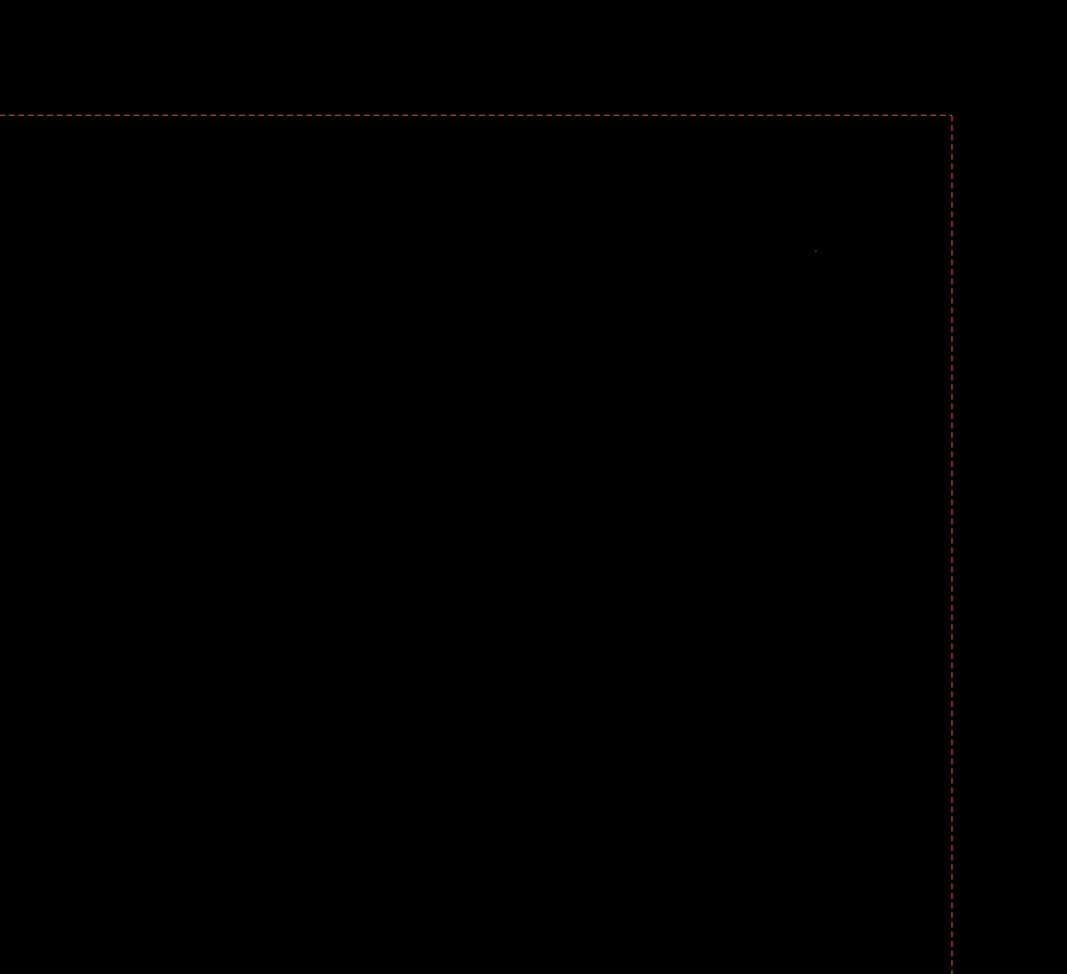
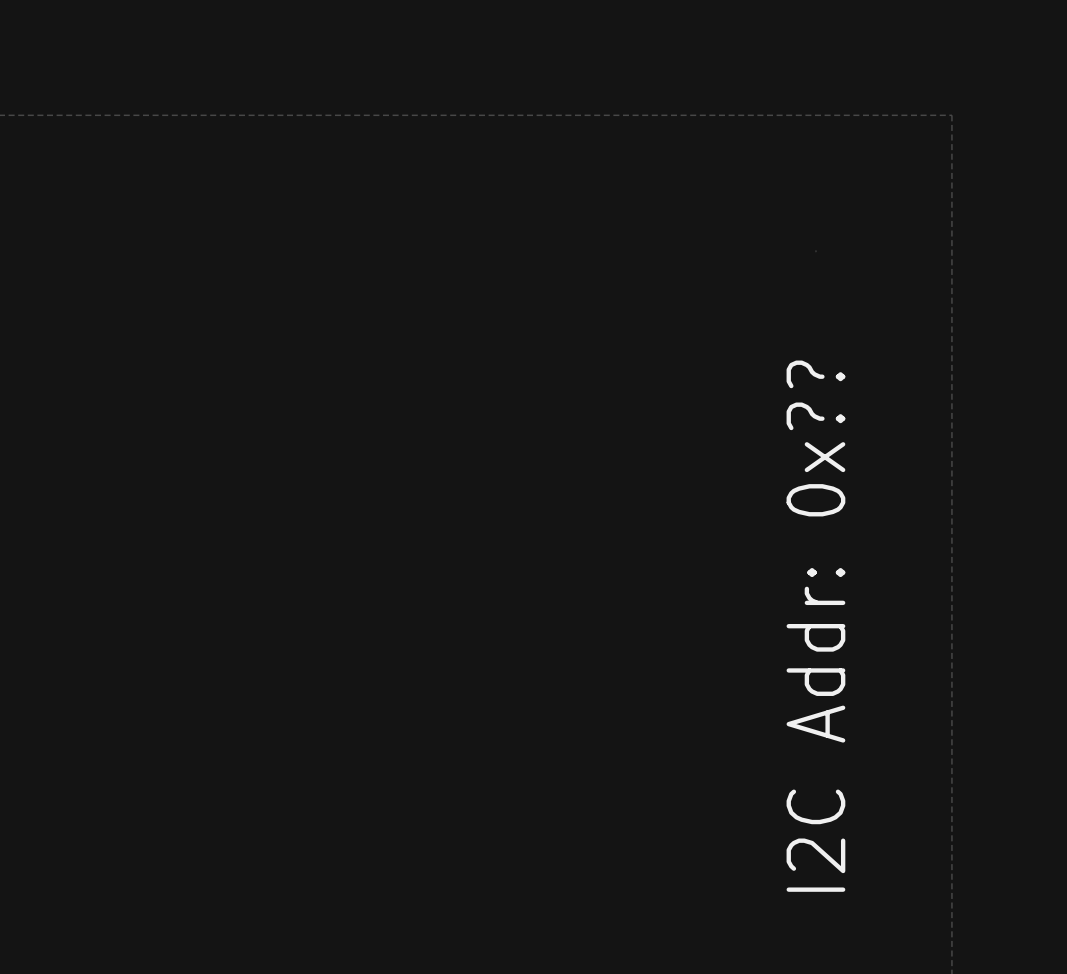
text: none -> I2C Addr: 0x?? (815, 626)

